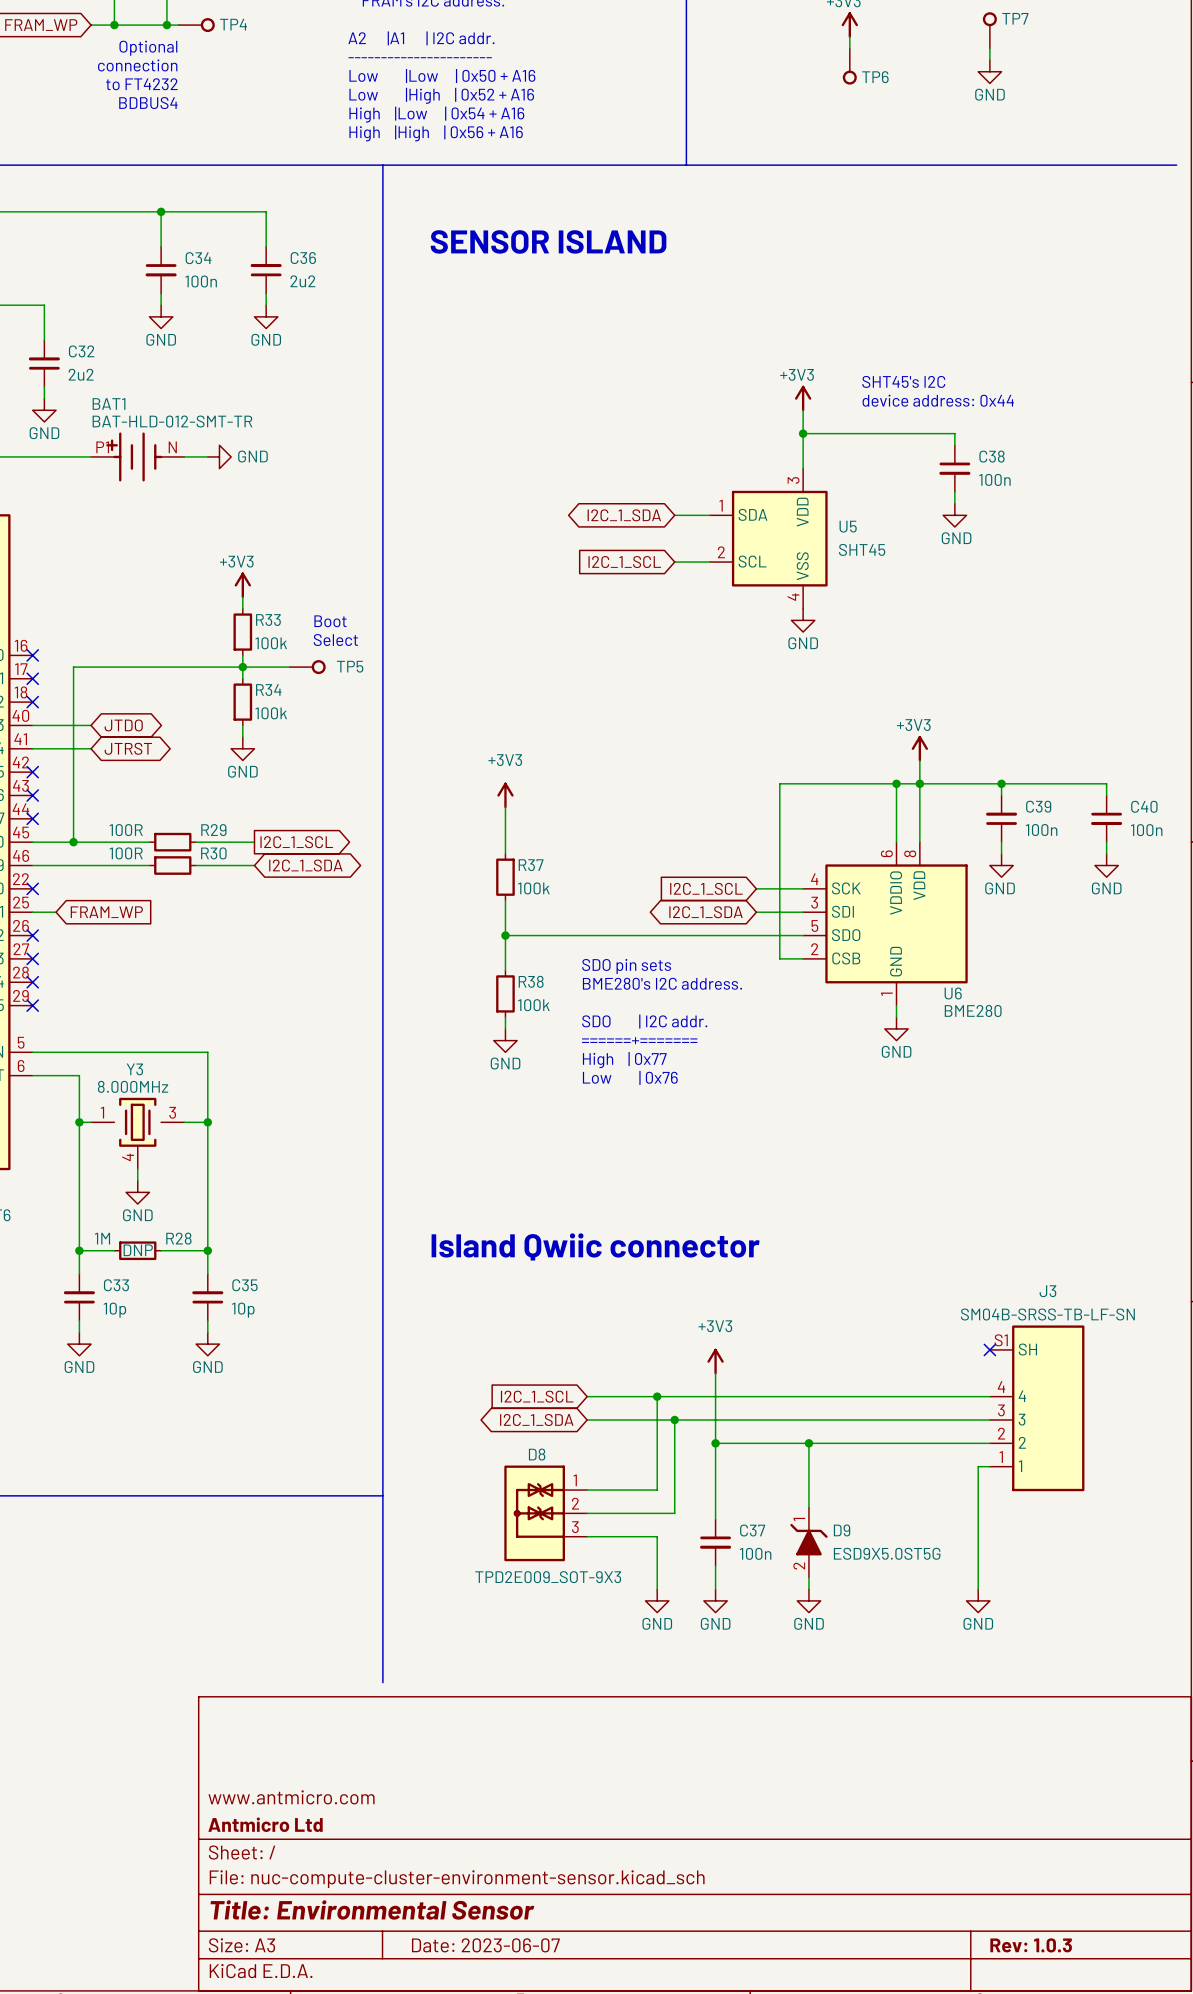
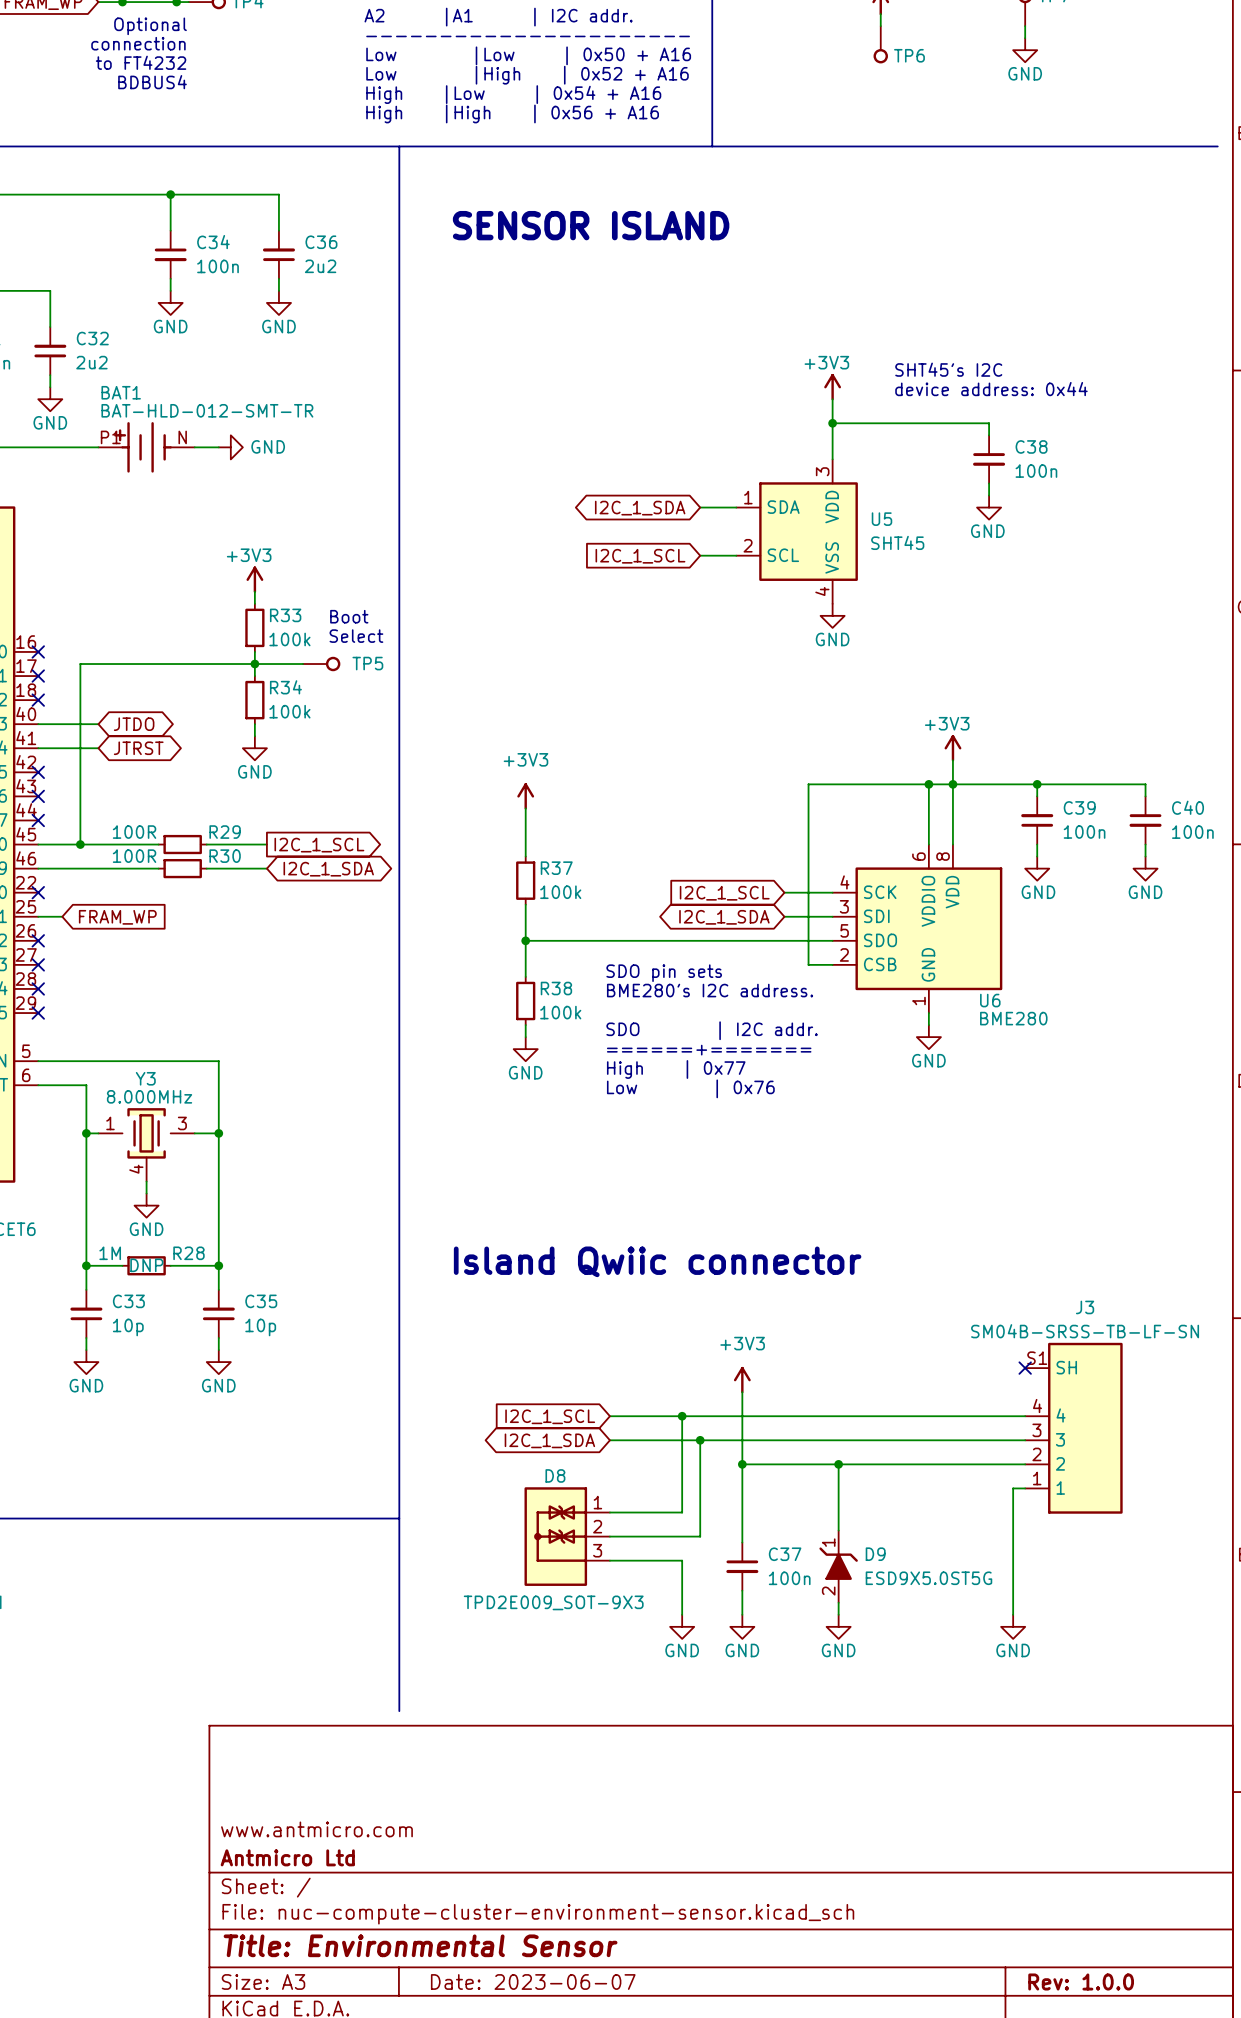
title block: Rev: 1.0.3 (1031, 1945) -> Rev: 1.0.0 (1081, 1981)

